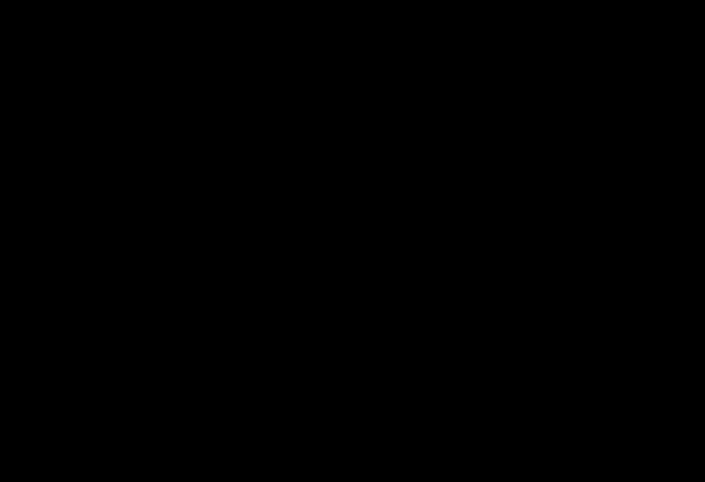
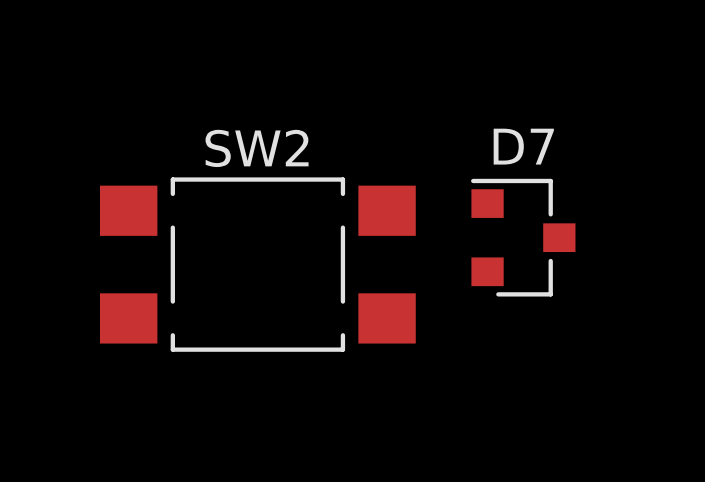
D7: none -> (523, 237)
SW2: none -> (257, 264)

